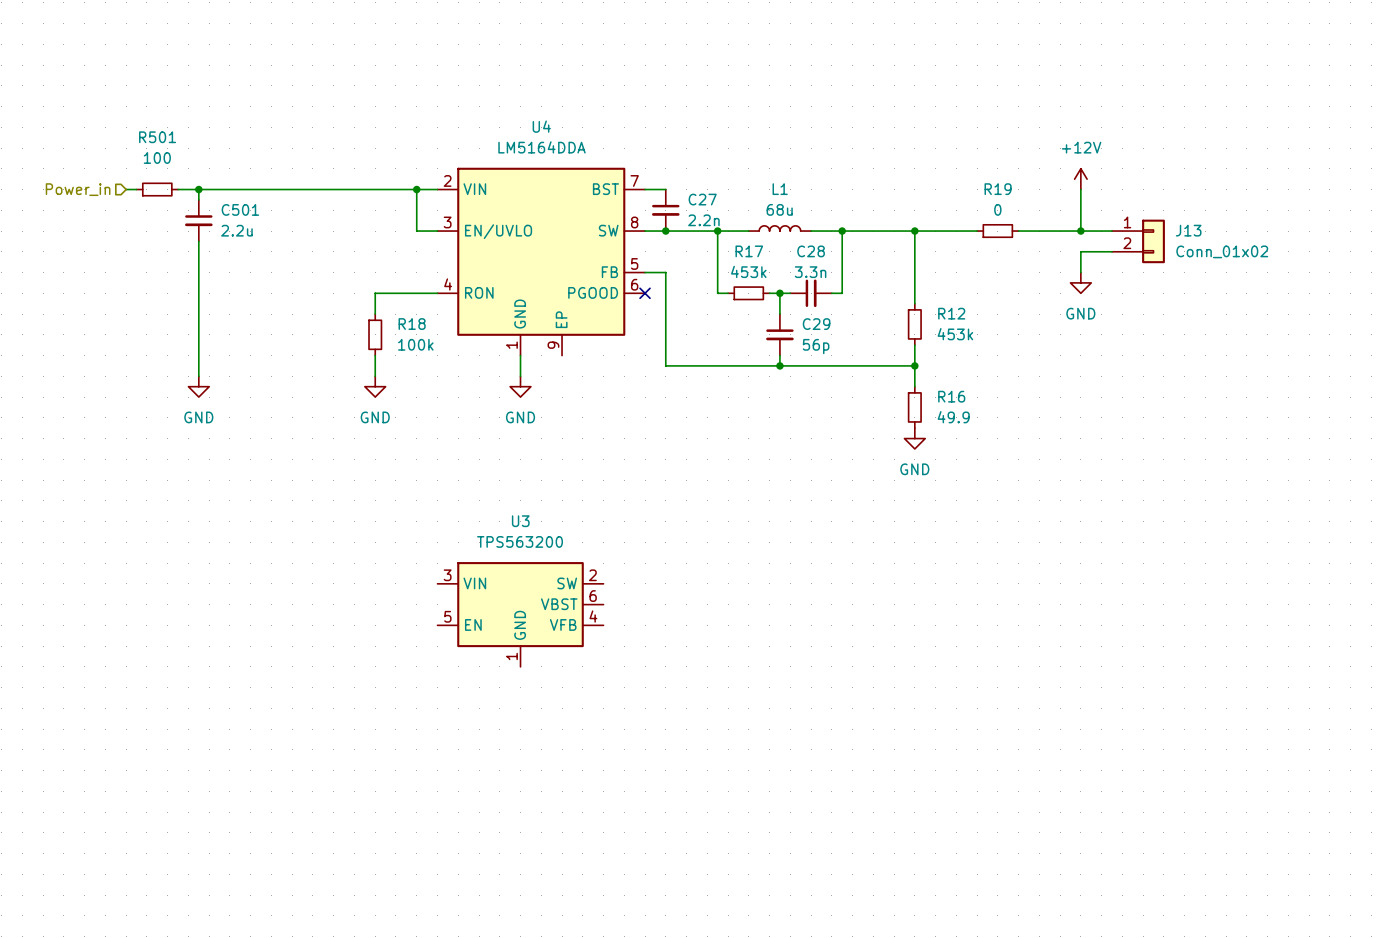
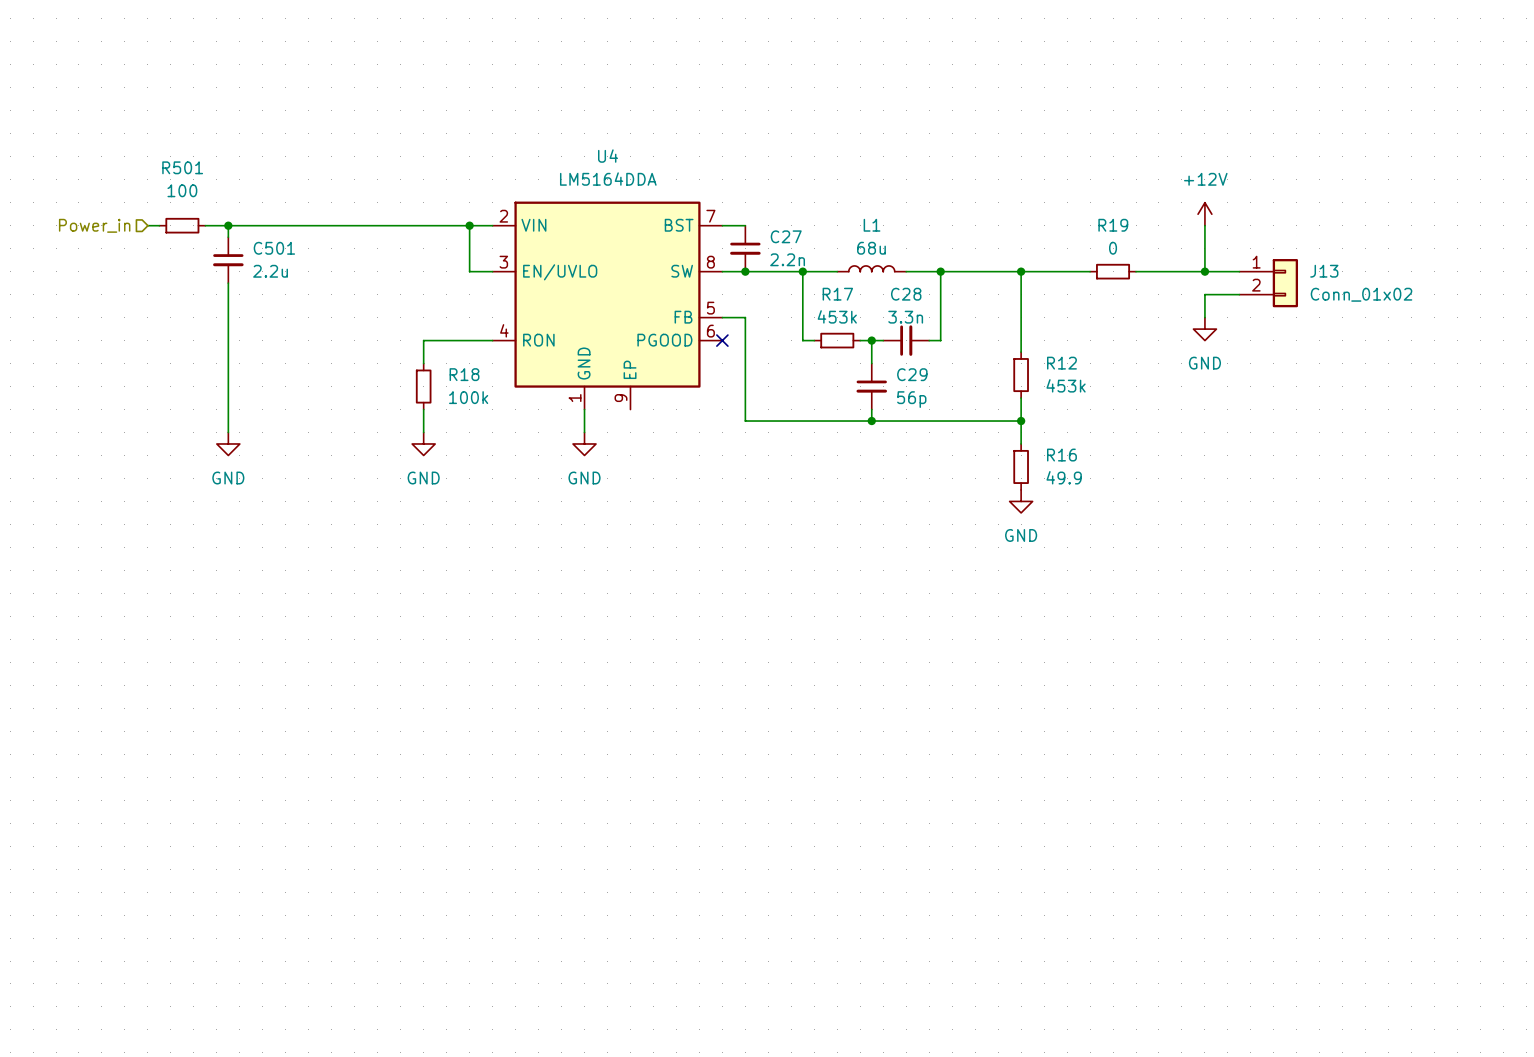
U3: TPS563200 (520, 614) -> none

